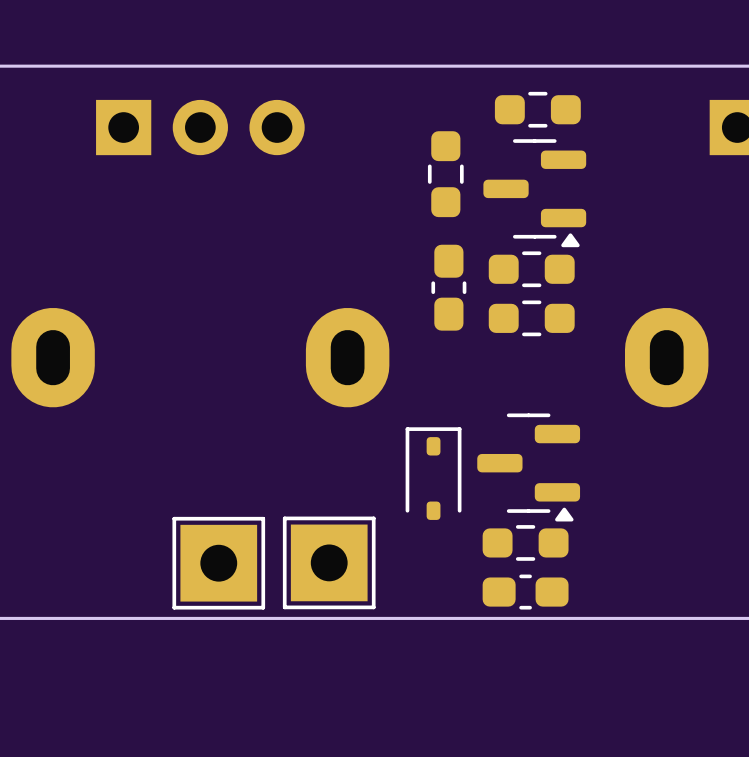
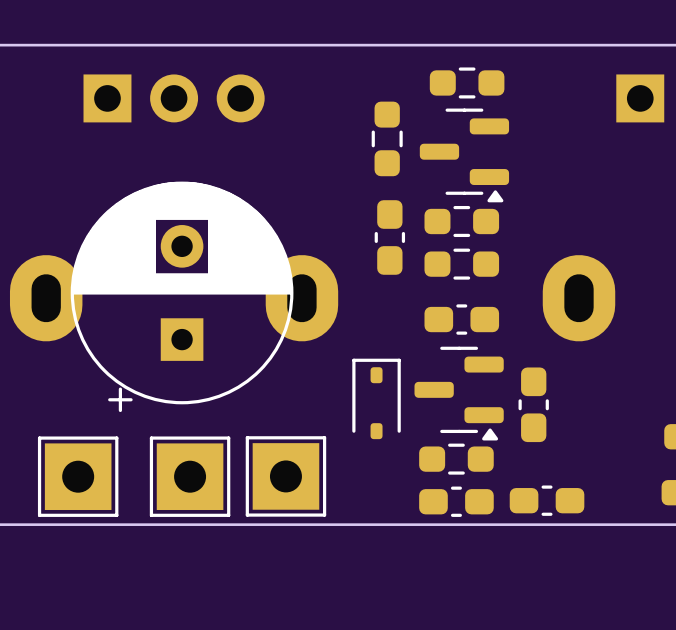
part: none -> (182, 296)
part: none -> (461, 319)
part: none -> (533, 404)
part: none -> (78, 476)
part: none -> (547, 500)

